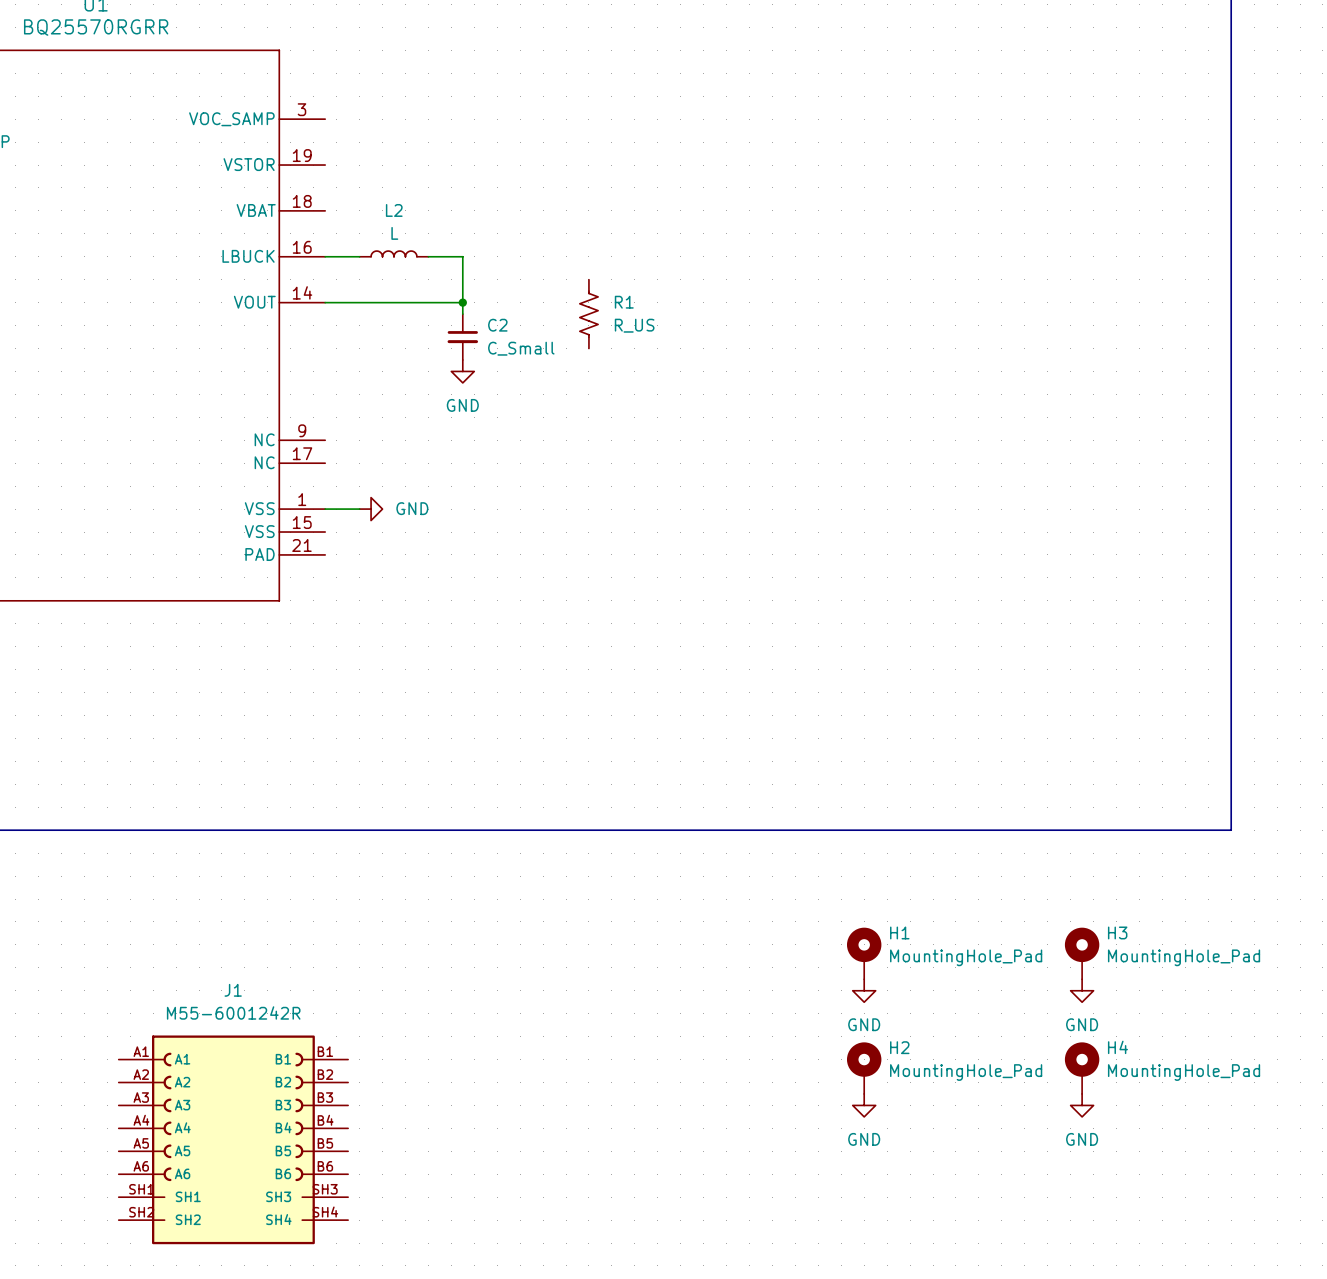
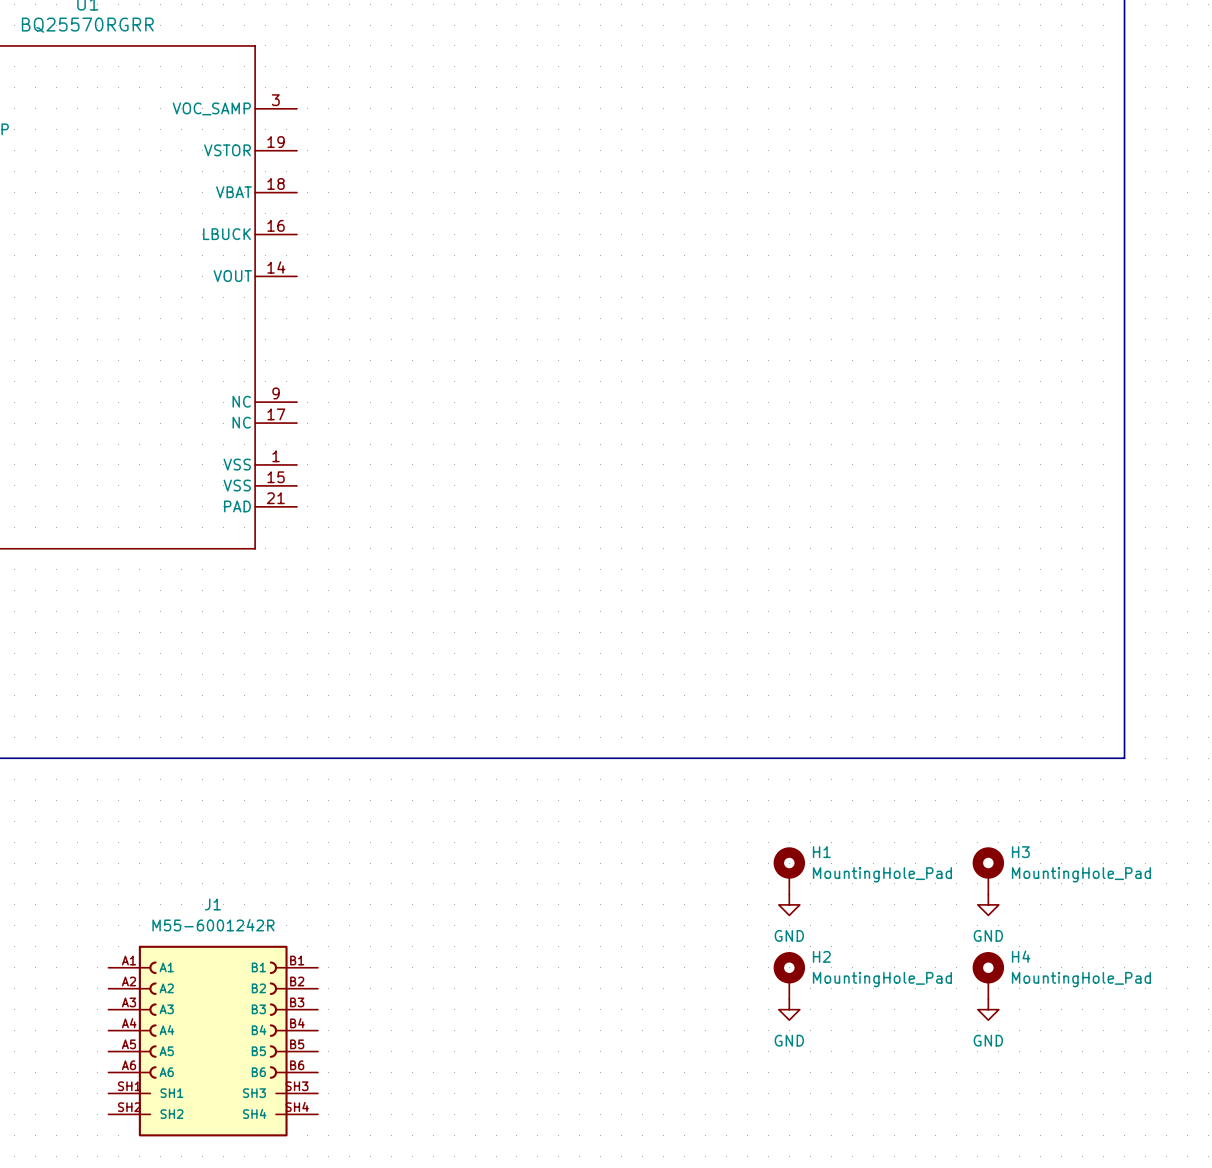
L2: L (393, 253) -> none
wire: (325, 256) (359, 256) -> none
wire: (428, 256) (462, 256) (462, 314) -> none
wire: (325, 302) (462, 302) -> none
junction: (462, 302) -> none
R1: R_US (588, 314) -> none
C2: C_Small (462, 337) -> none
power symbol: GND (462, 371) -> none
wire: (325, 509) (359, 509) -> none
power symbol: GND (371, 509) -> none

